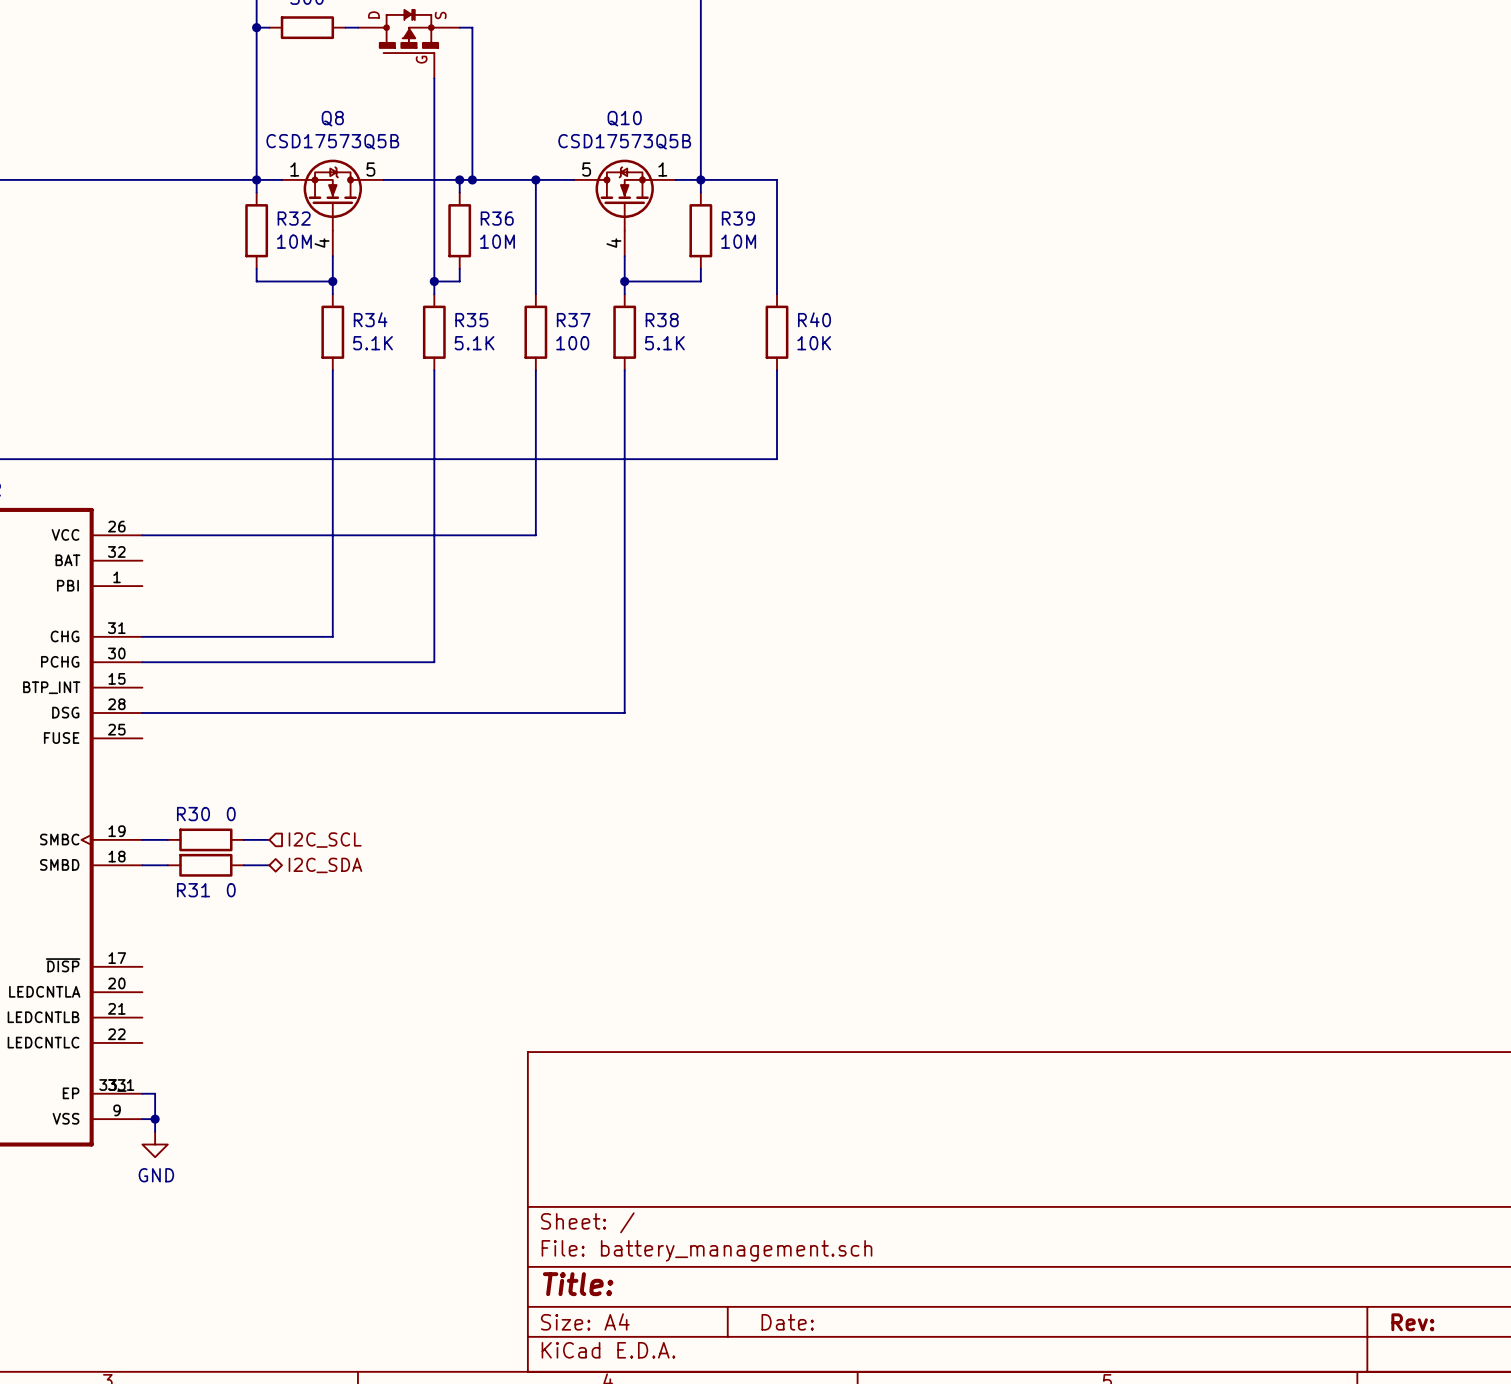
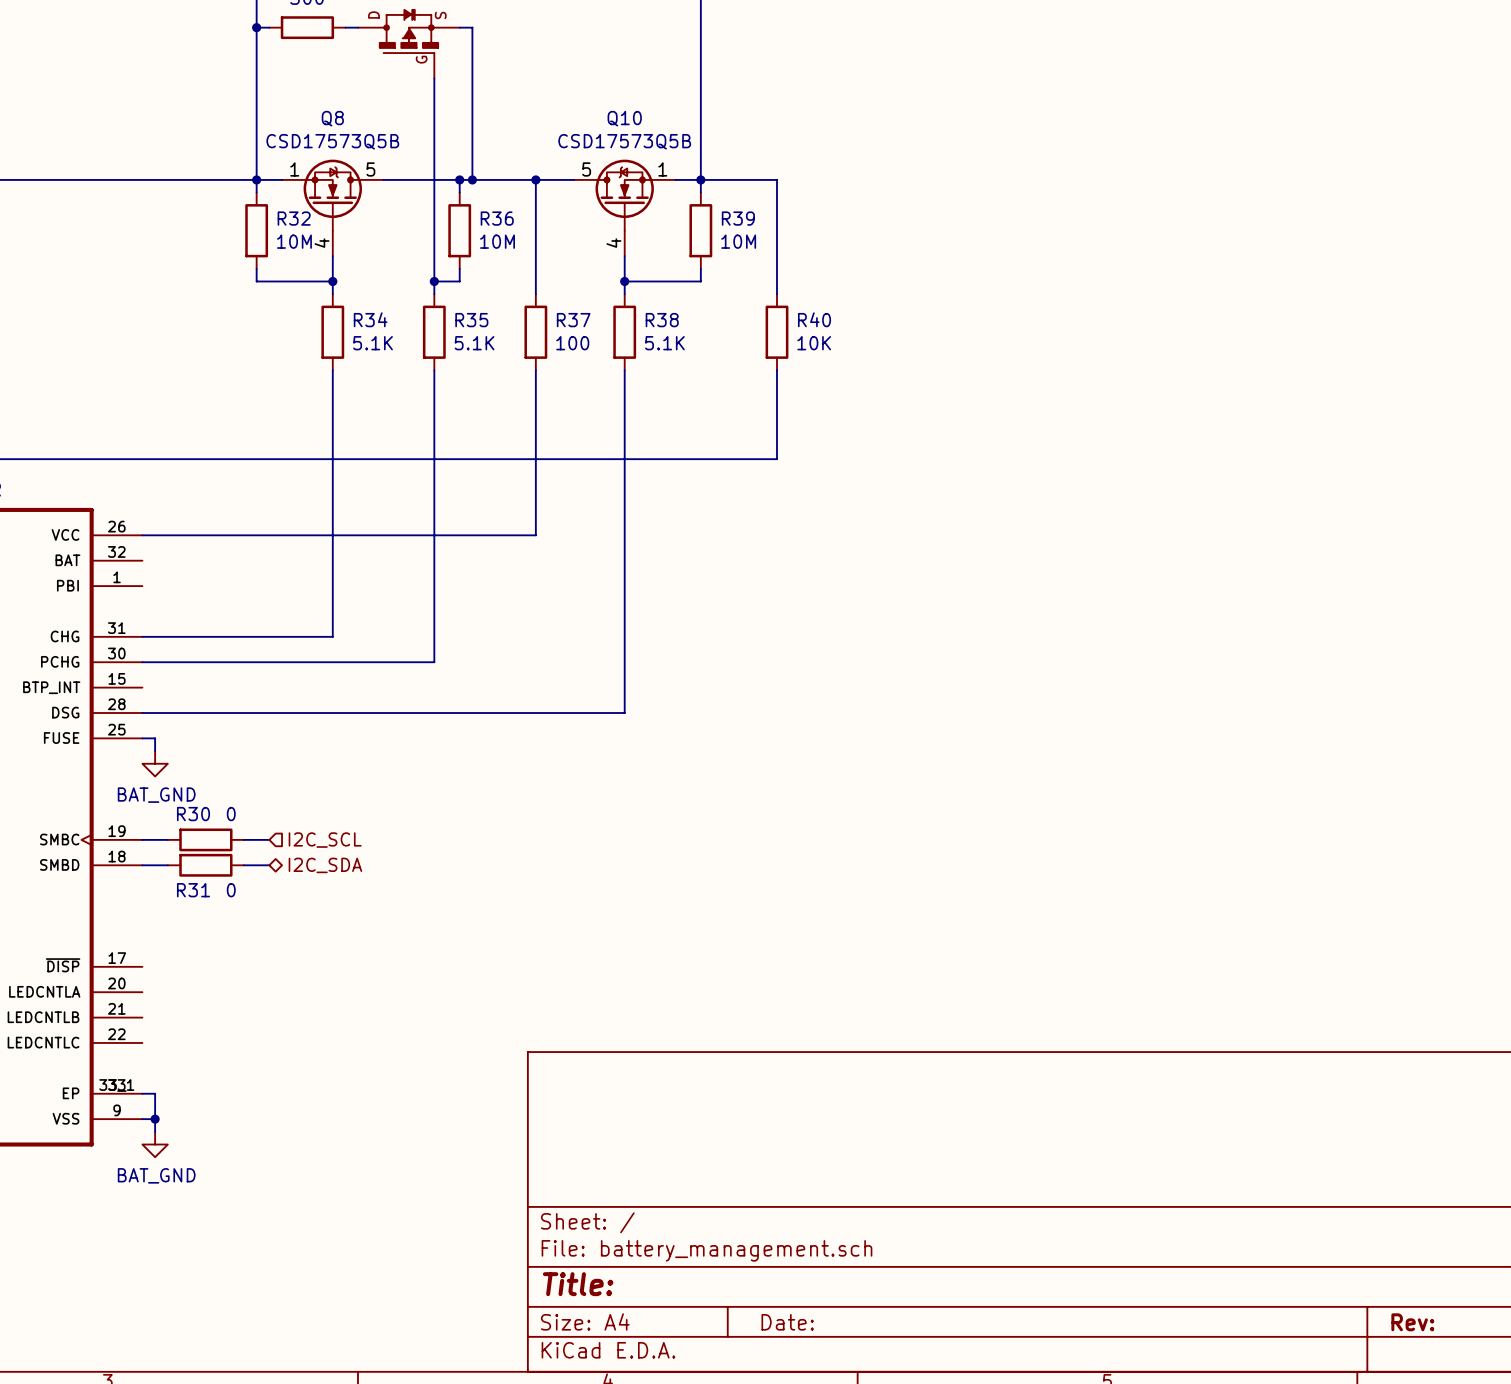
wire: none -> (142, 738) (155, 738) (155, 751)
power symbol: none -> BAT_GND (155, 763)
power symbol: GND (155, 1144) -> BAT_GND (155, 1144)

